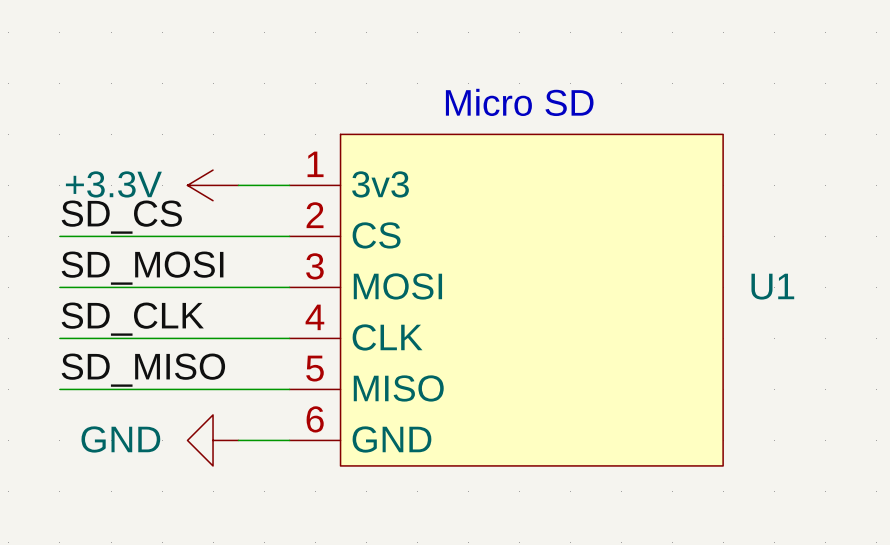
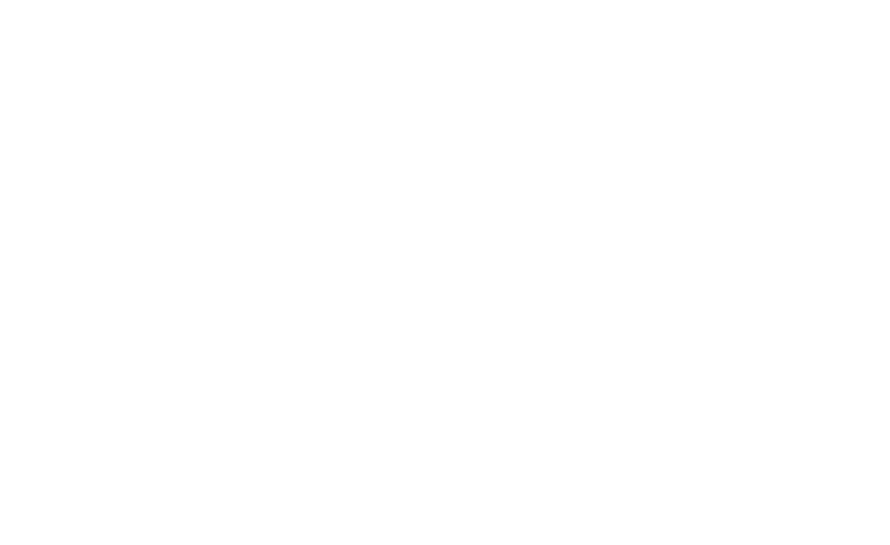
text: Micro SD (519, 102) -> none
power symbol: +3.3V (213, 185) -> none
wire: (238, 185) (289, 185) -> none
label: SD_CS (121, 217) -> none
wire: (59, 236) (289, 236) -> none
label: SD_MOSI (142, 268) -> none
wire: (59, 287) (289, 287) -> none
U1: (506, 300) -> none
label: SD_CLK (132, 319) -> none
wire: (59, 338) (289, 338) -> none
label: SD_MISO (143, 370) -> none
wire: (59, 389) (289, 389) -> none
power symbol: GND (213, 440) -> none
wire: (238, 440) (289, 440) -> none

